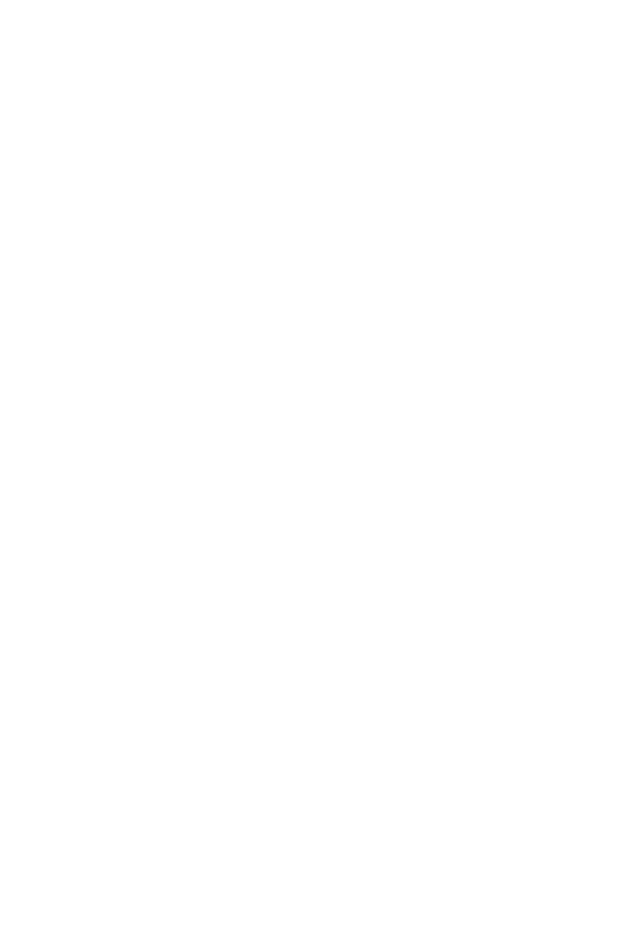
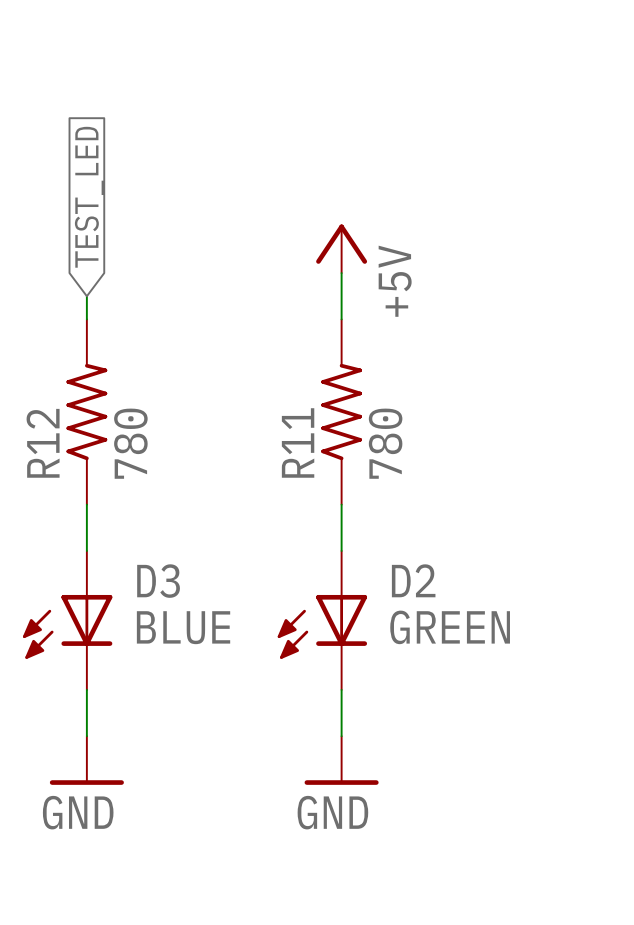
global label: none -> TEST_LED (89, 197)
power symbol: none -> +5V (341, 248)
wire: none -> (341, 273) (341, 319)
wire: none -> (86, 296) (86, 319)
R12: none -> 780 (86, 412)
R11: none -> 780 (341, 412)
wire: none -> (86, 504) (86, 550)
wire: none -> (341, 504) (341, 550)
D3: none -> BLUE (67, 620)
D2: none -> GREEN (322, 620)
wire: none -> (86, 689) (86, 736)
wire: none -> (341, 689) (341, 736)
power symbol: none -> GND (86, 760)
power symbol: none -> GND (341, 760)

